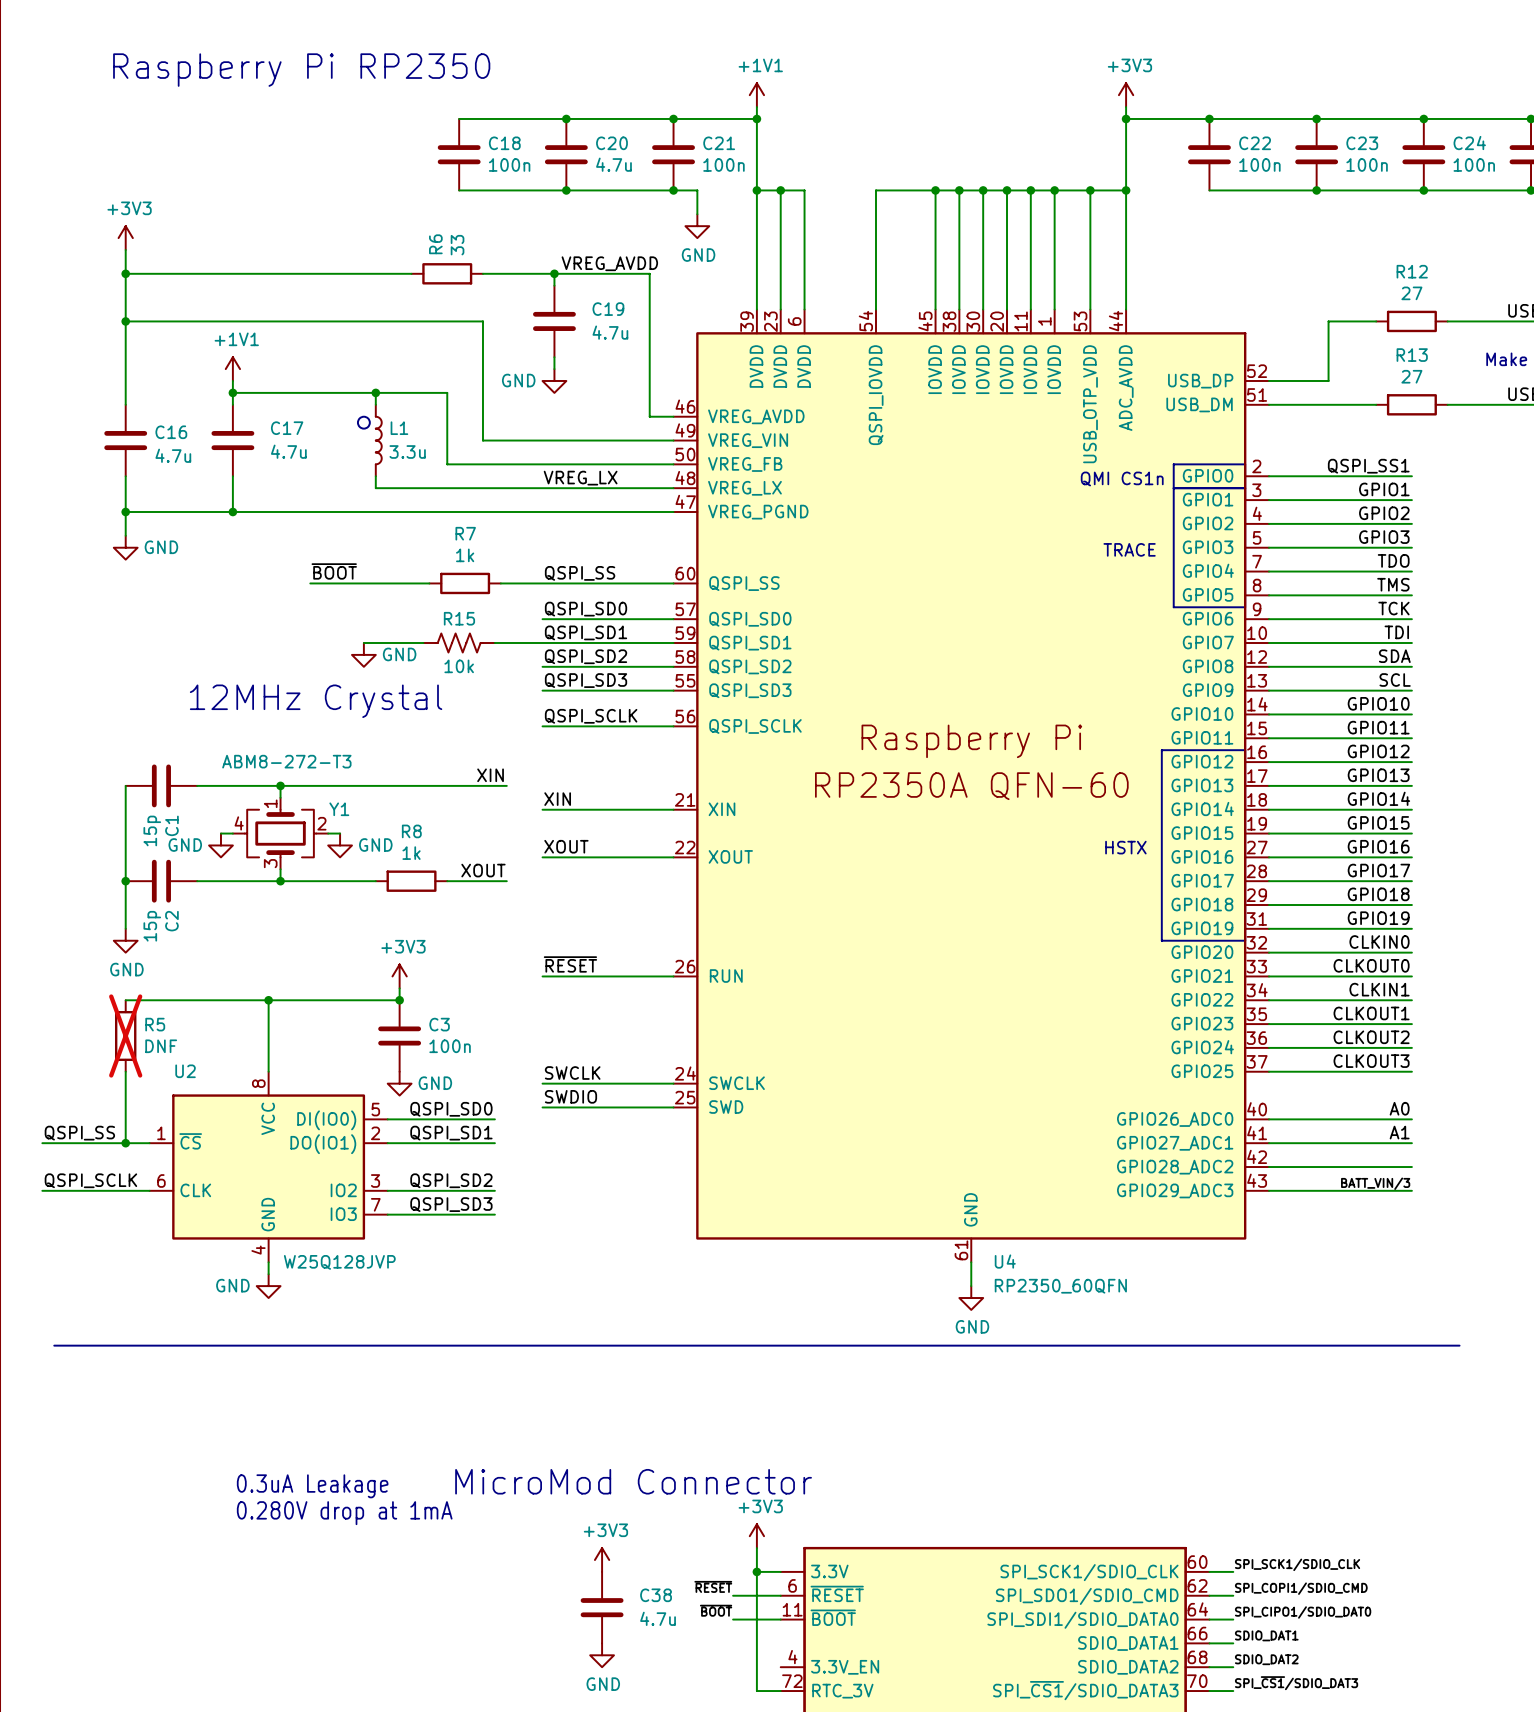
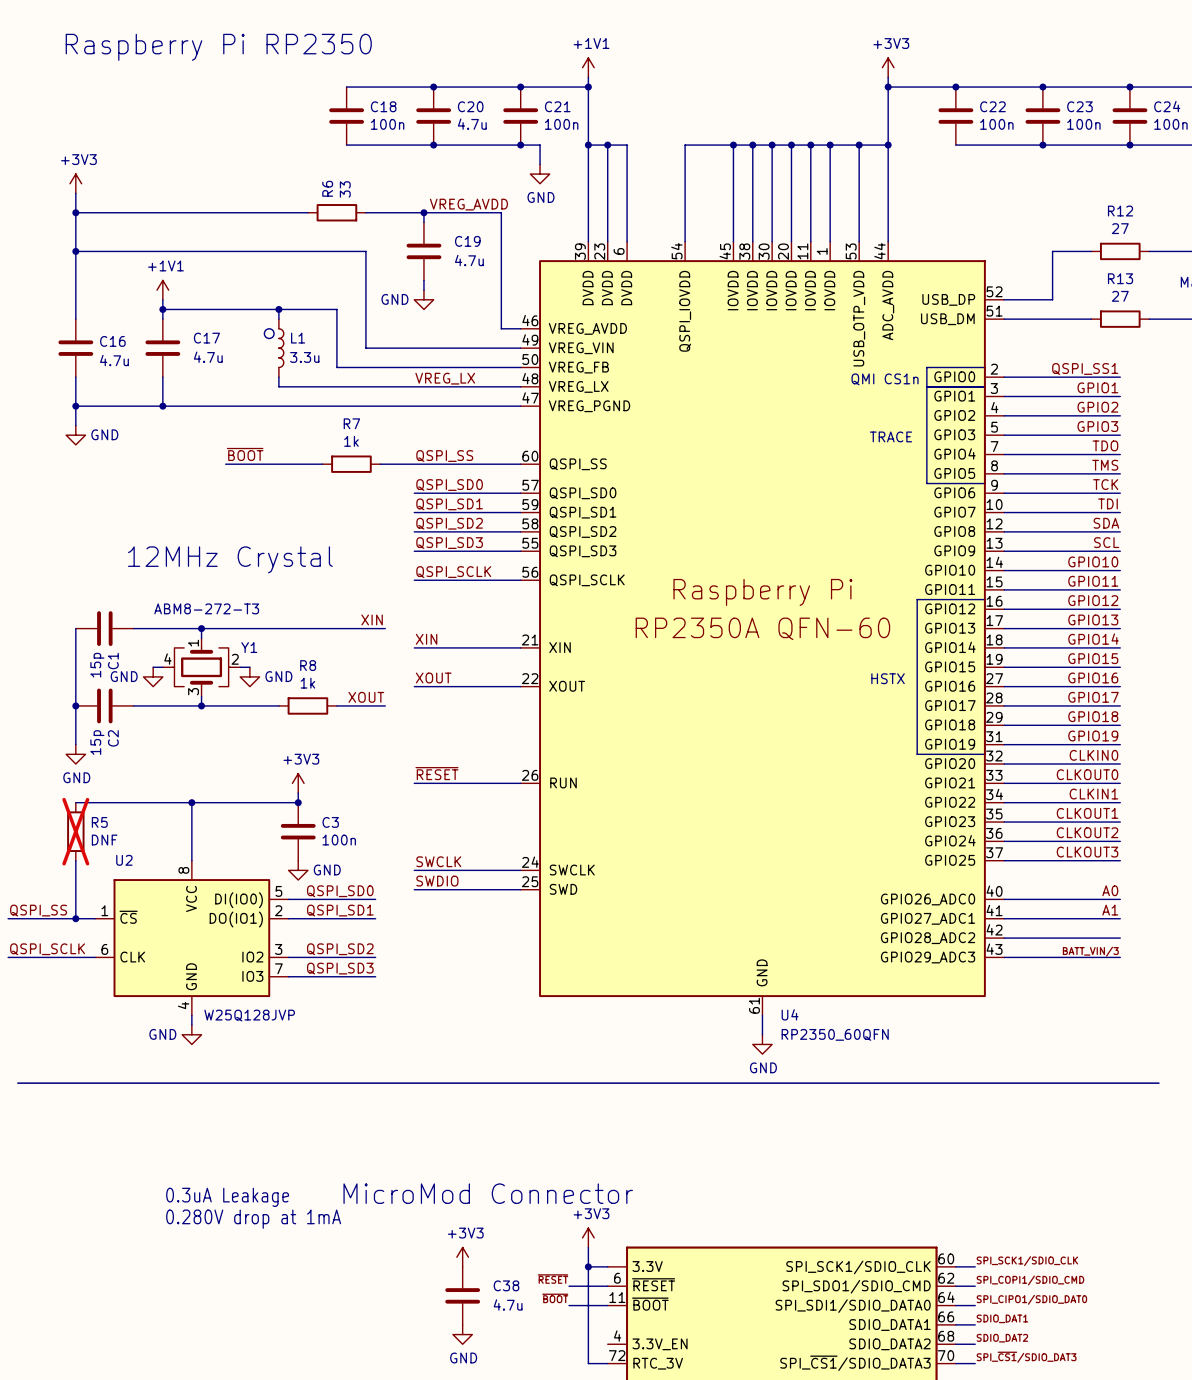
wire: (363, 643) (423, 643) -> none
R15: 10k (459, 643) -> none
wire: (494, 643) (542, 643) -> none
power symbol: GND (363, 654) -> none

